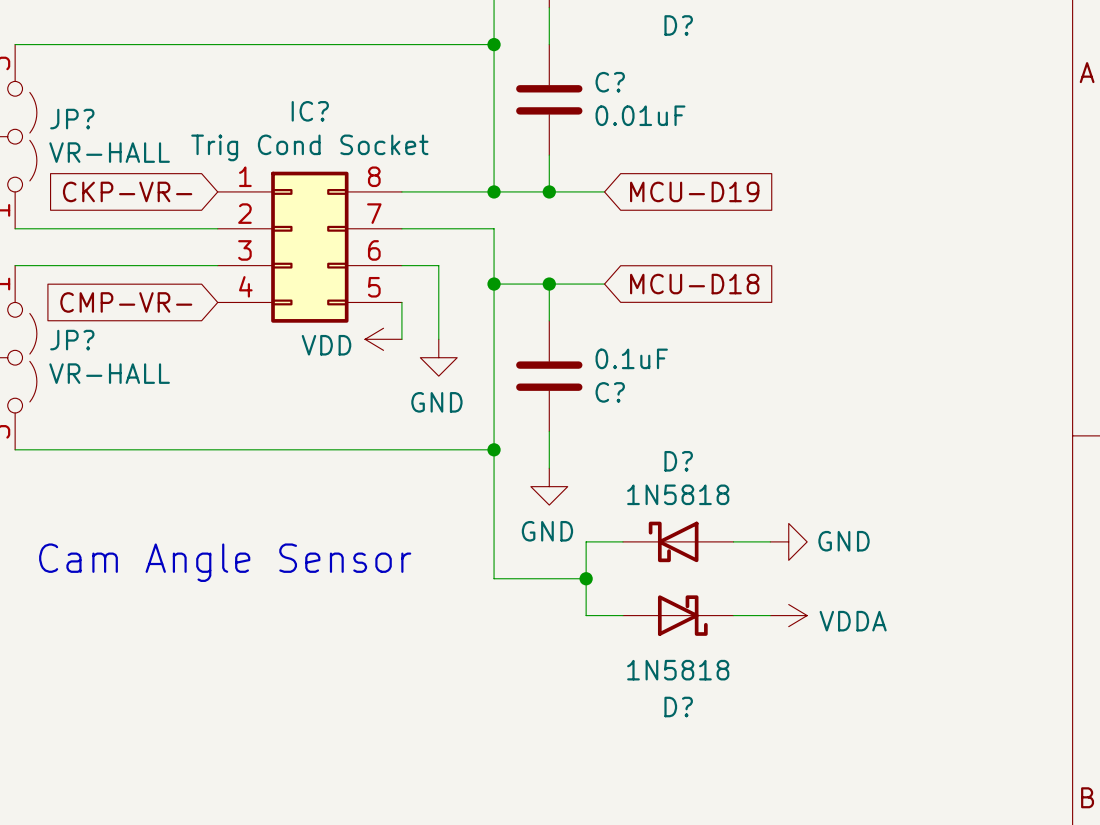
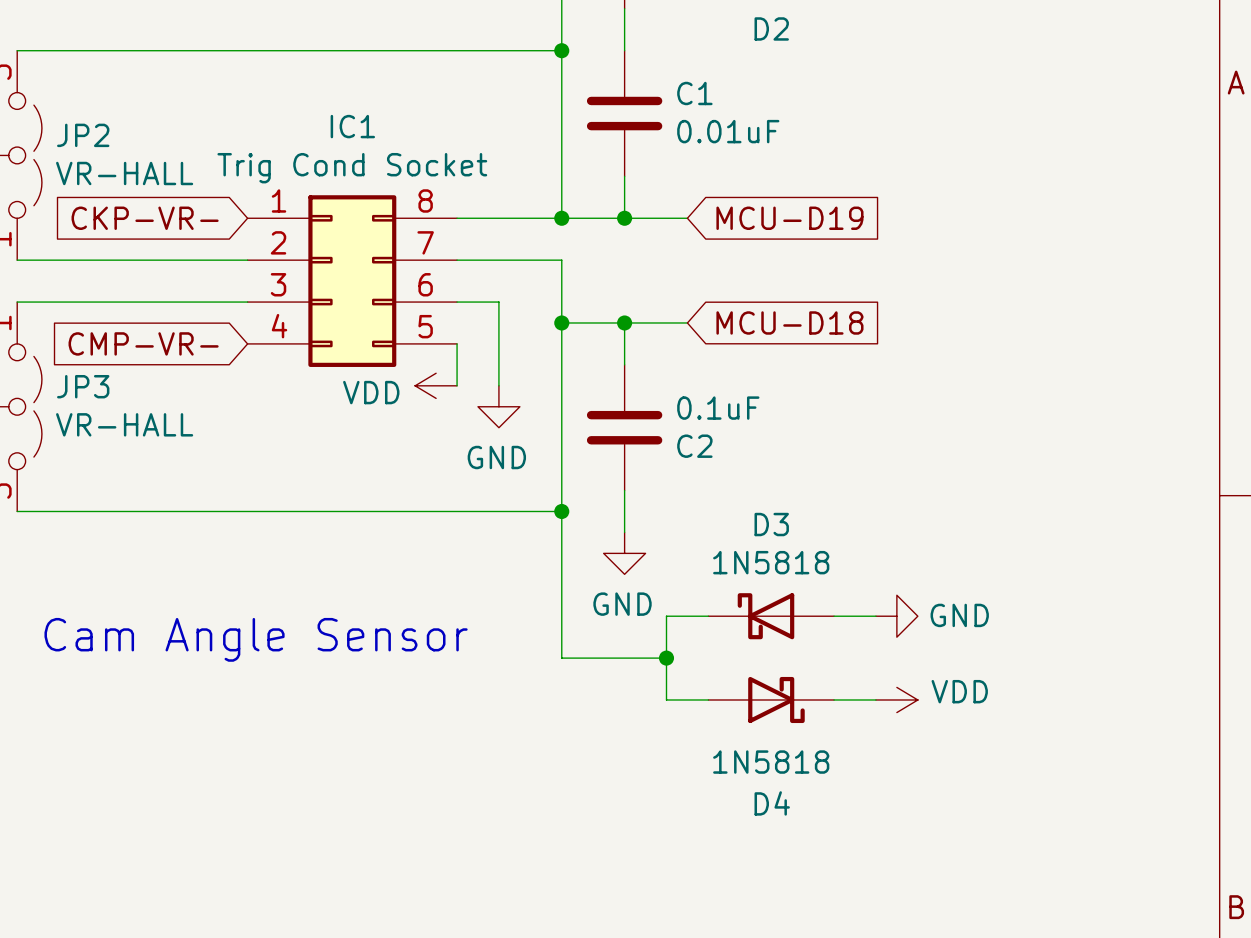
D? name: D? (678, 25) -> D2 (771, 28)
C? name: C? (610, 82) -> C1 (694, 93)
IC? name: IC? (310, 111) -> IC1 (352, 126)
JP? name: JP? (72, 119) -> JP2 (83, 135)
JP? name: JP? (72, 340) -> JP3 (83, 386)
C? name: C? (610, 392) -> C2 (694, 446)
D? name: D? (678, 461) -> D3 (771, 524)
power symbol: VDDA (788, 615) -> VDD (896, 699)
D? name: D? (678, 707) -> D4 (772, 803)

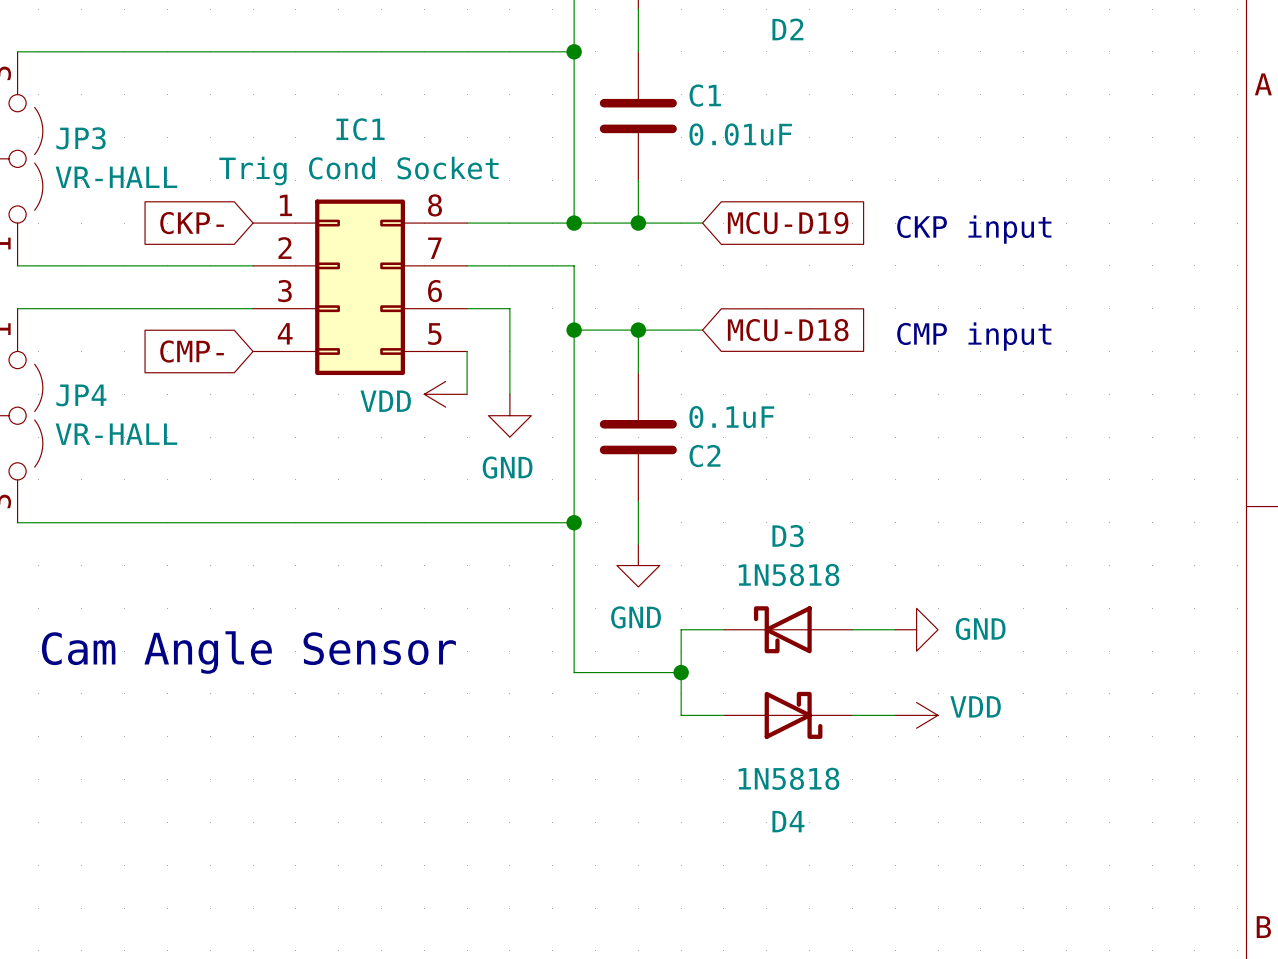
JP2 name: JP2 (83, 135) -> JP3 (81, 138)
global label: CKP-VR- (145, 218) -> CKP- (192, 223)
text: none -> CKP input (974, 229)
text: none -> CMP input (974, 336)
global label: CMP-VR- (143, 343) -> CMP- (192, 351)
JP3 name: JP3 (83, 386) -> JP4 (81, 395)

